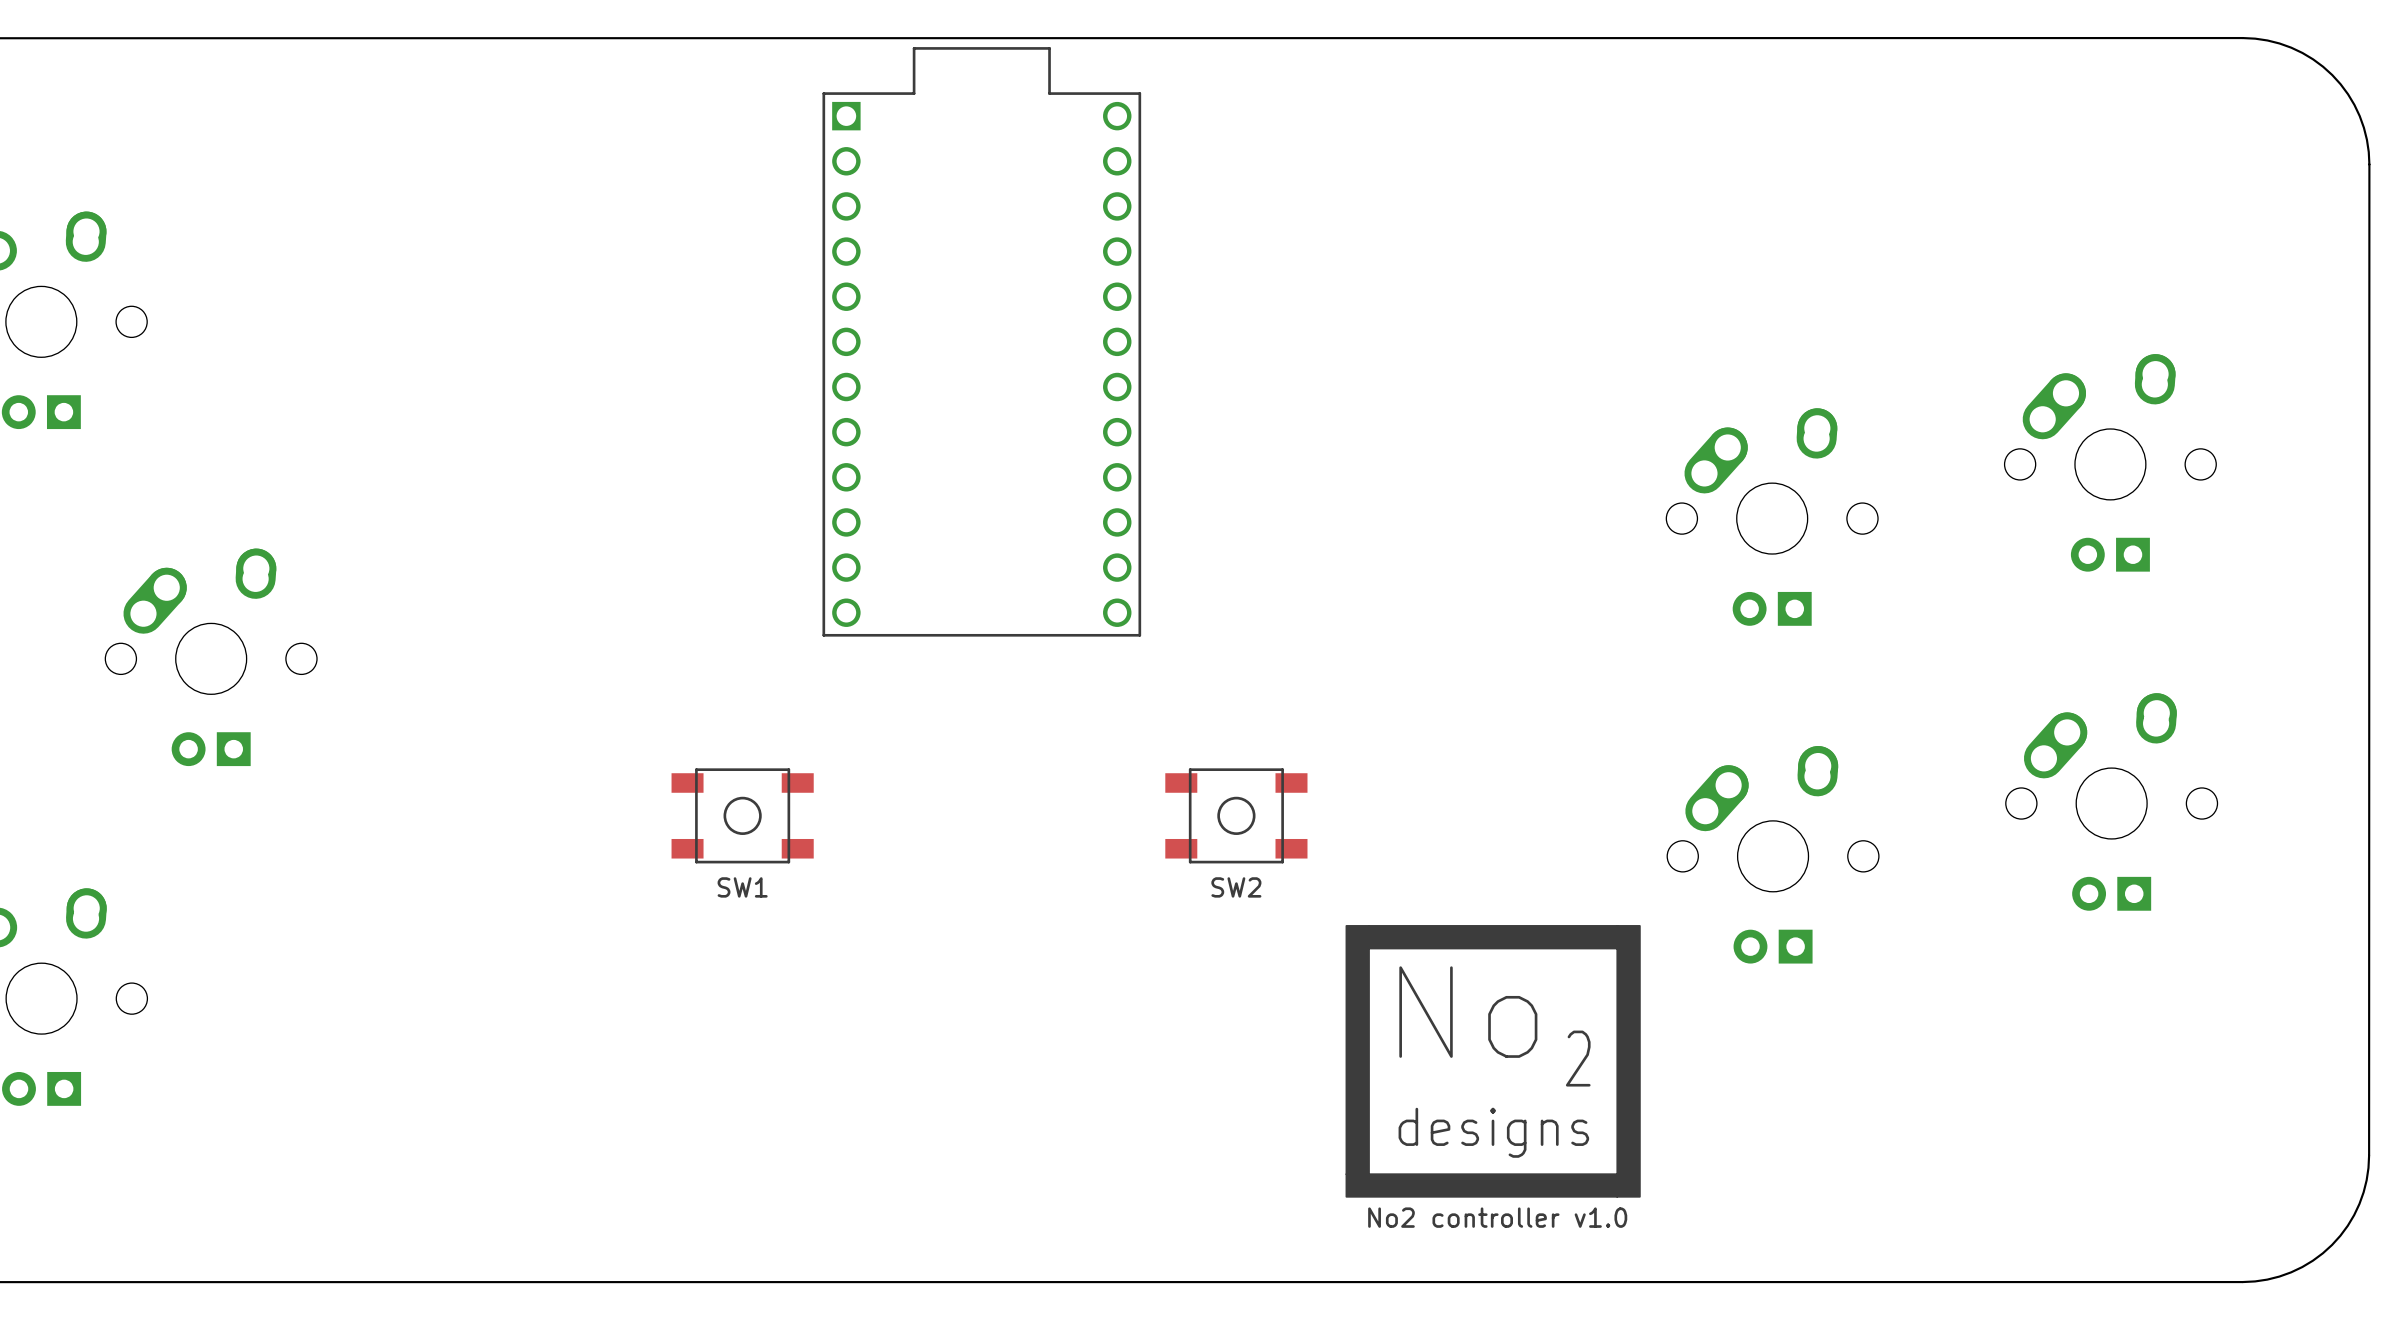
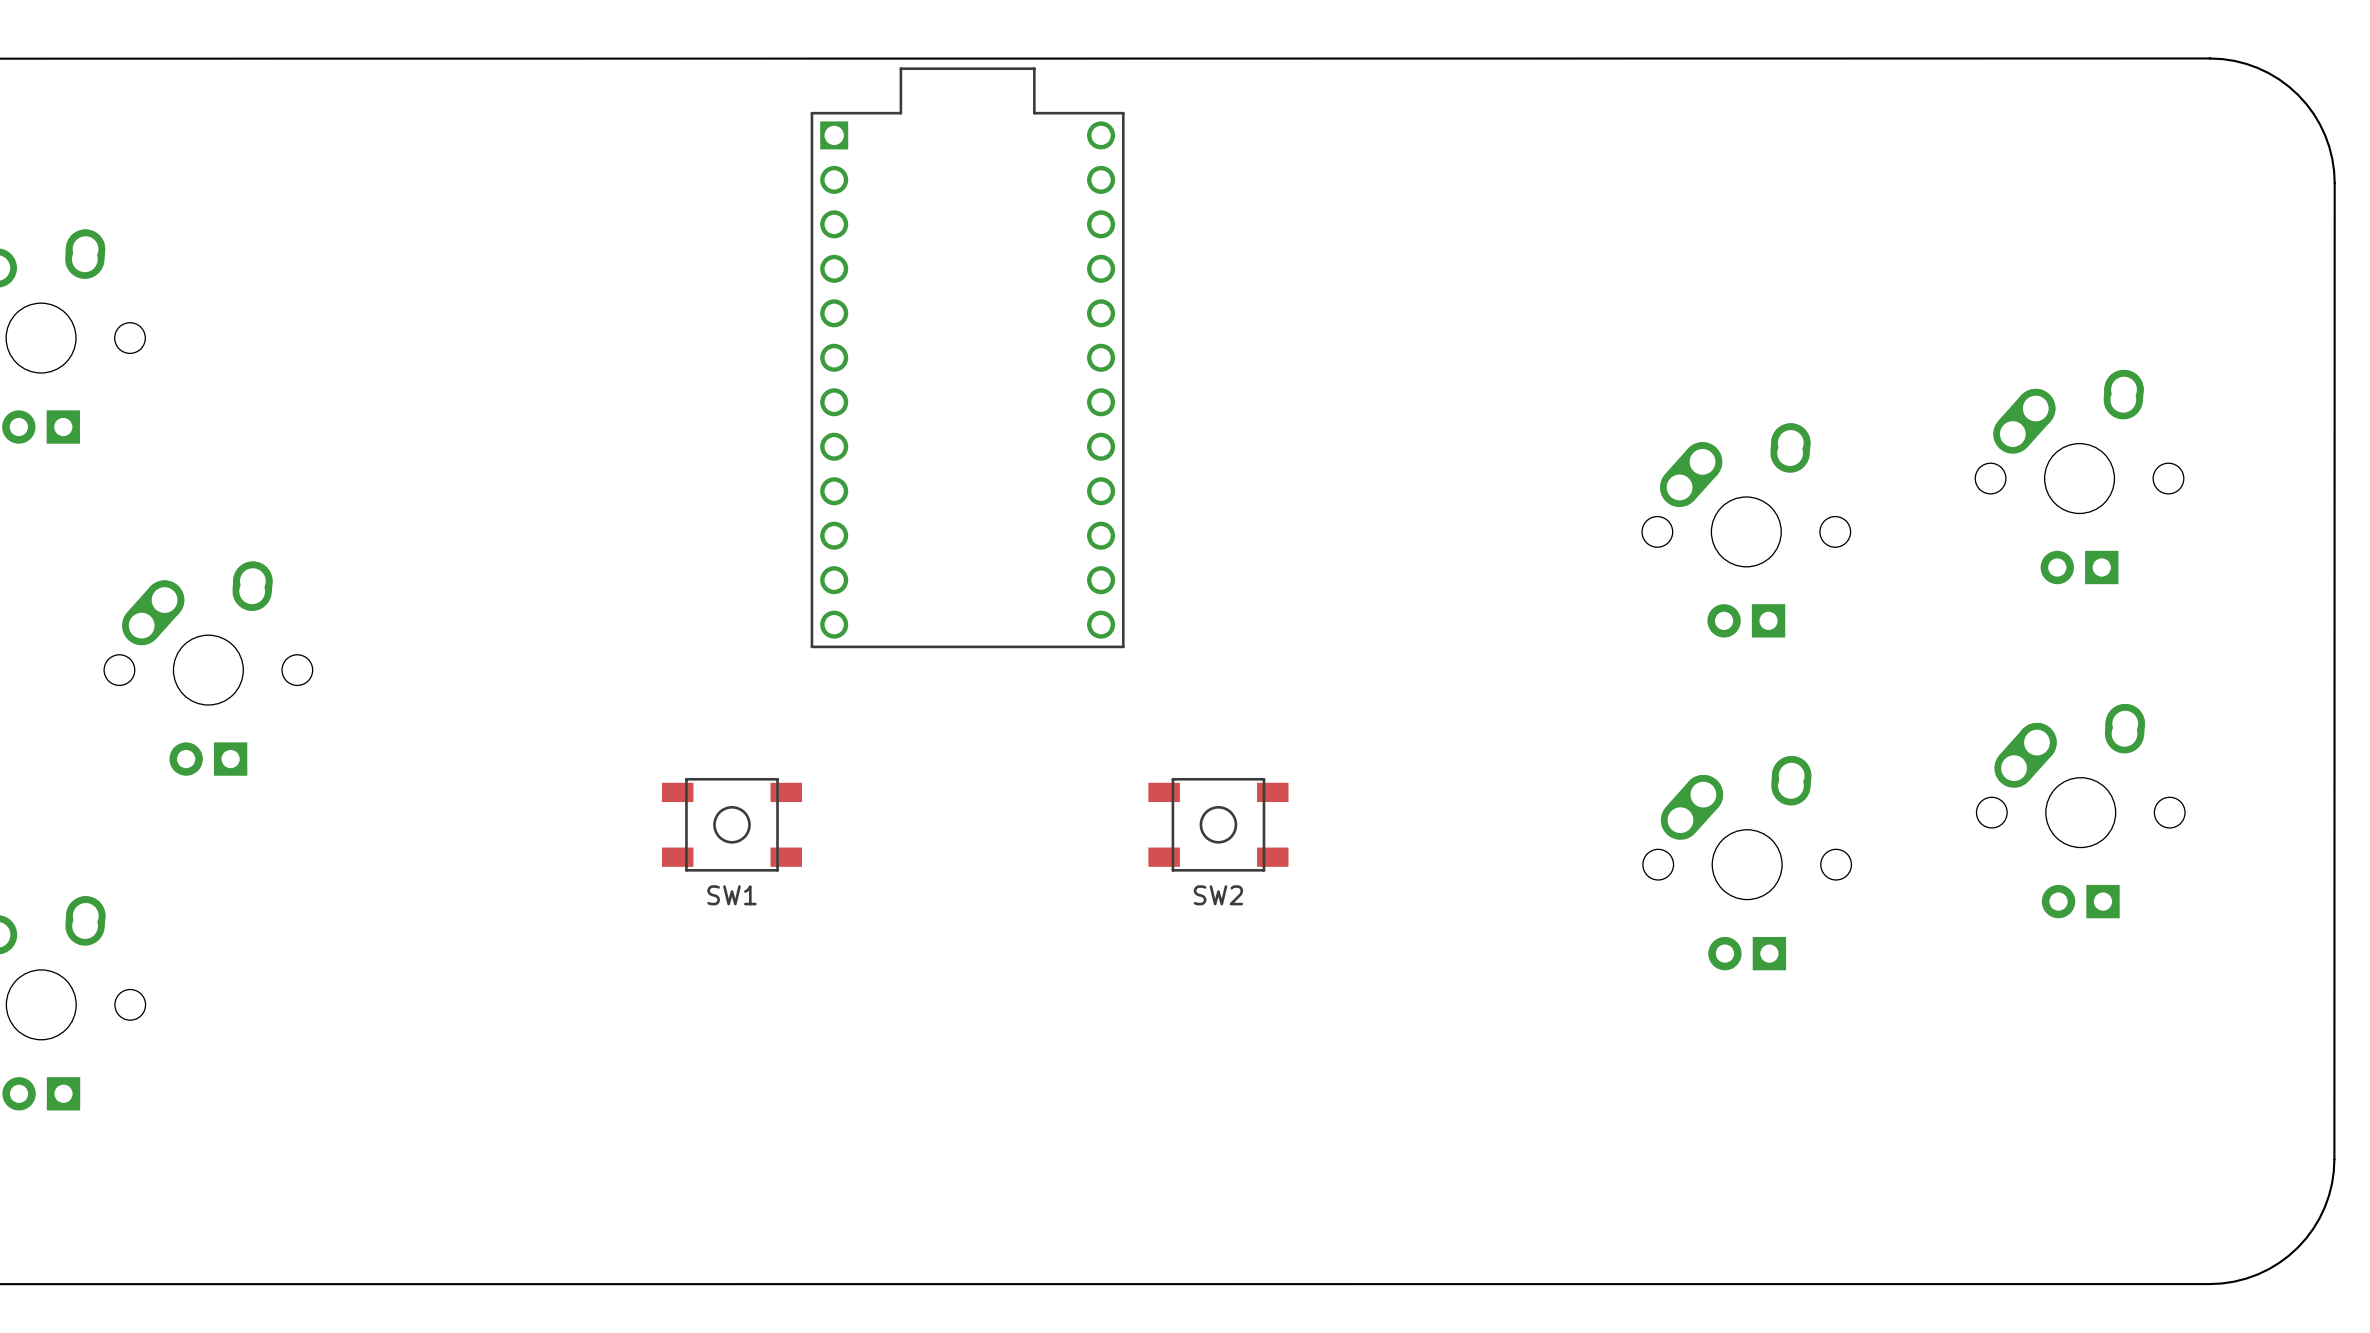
drawing: [1345, 925, 1641, 1198] -> none
text: No (1468, 1012) -> none
text: 2 (1578, 1058) -> none
text: designs (1493, 1132) -> none
text: No2 controller v1.0 (1497, 1217) -> none

